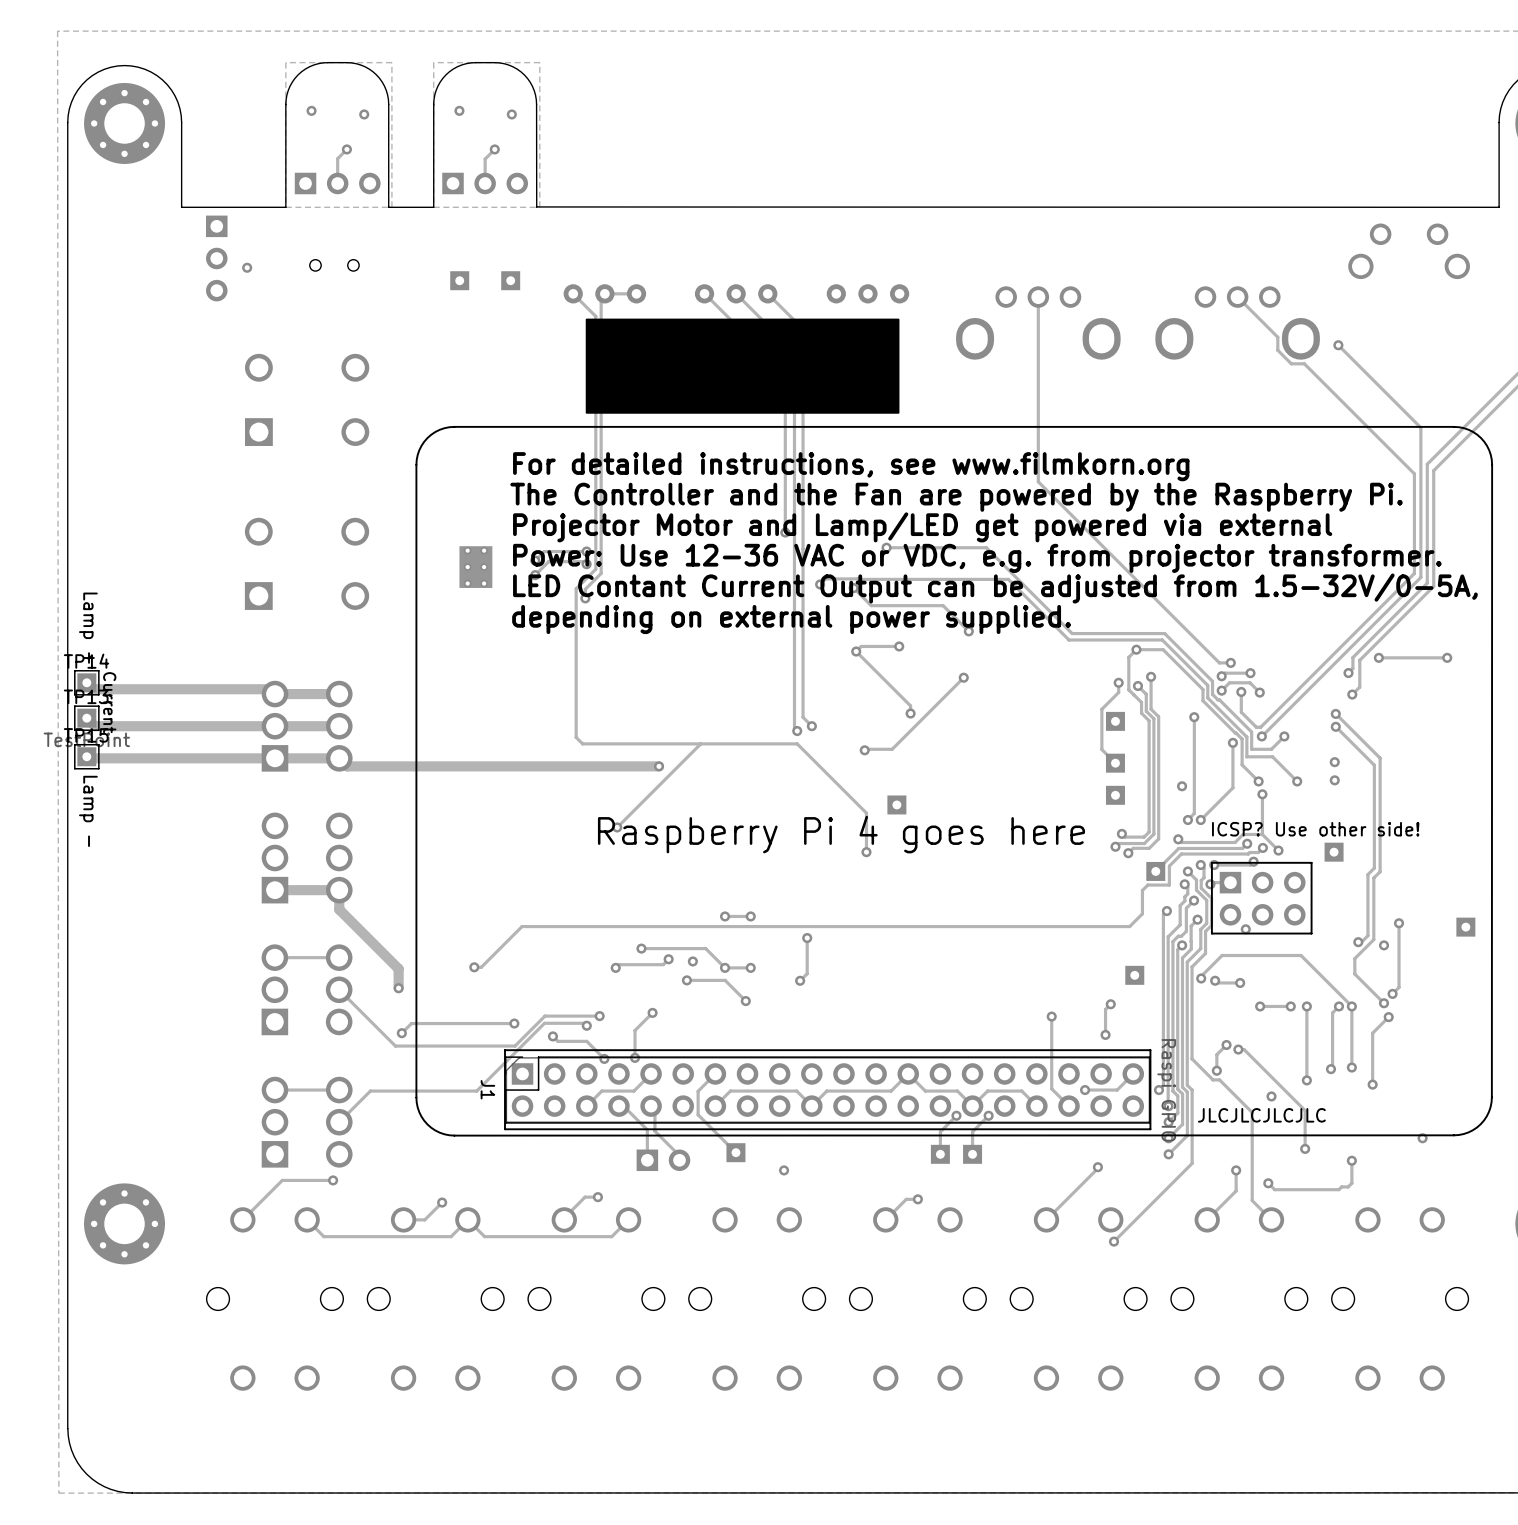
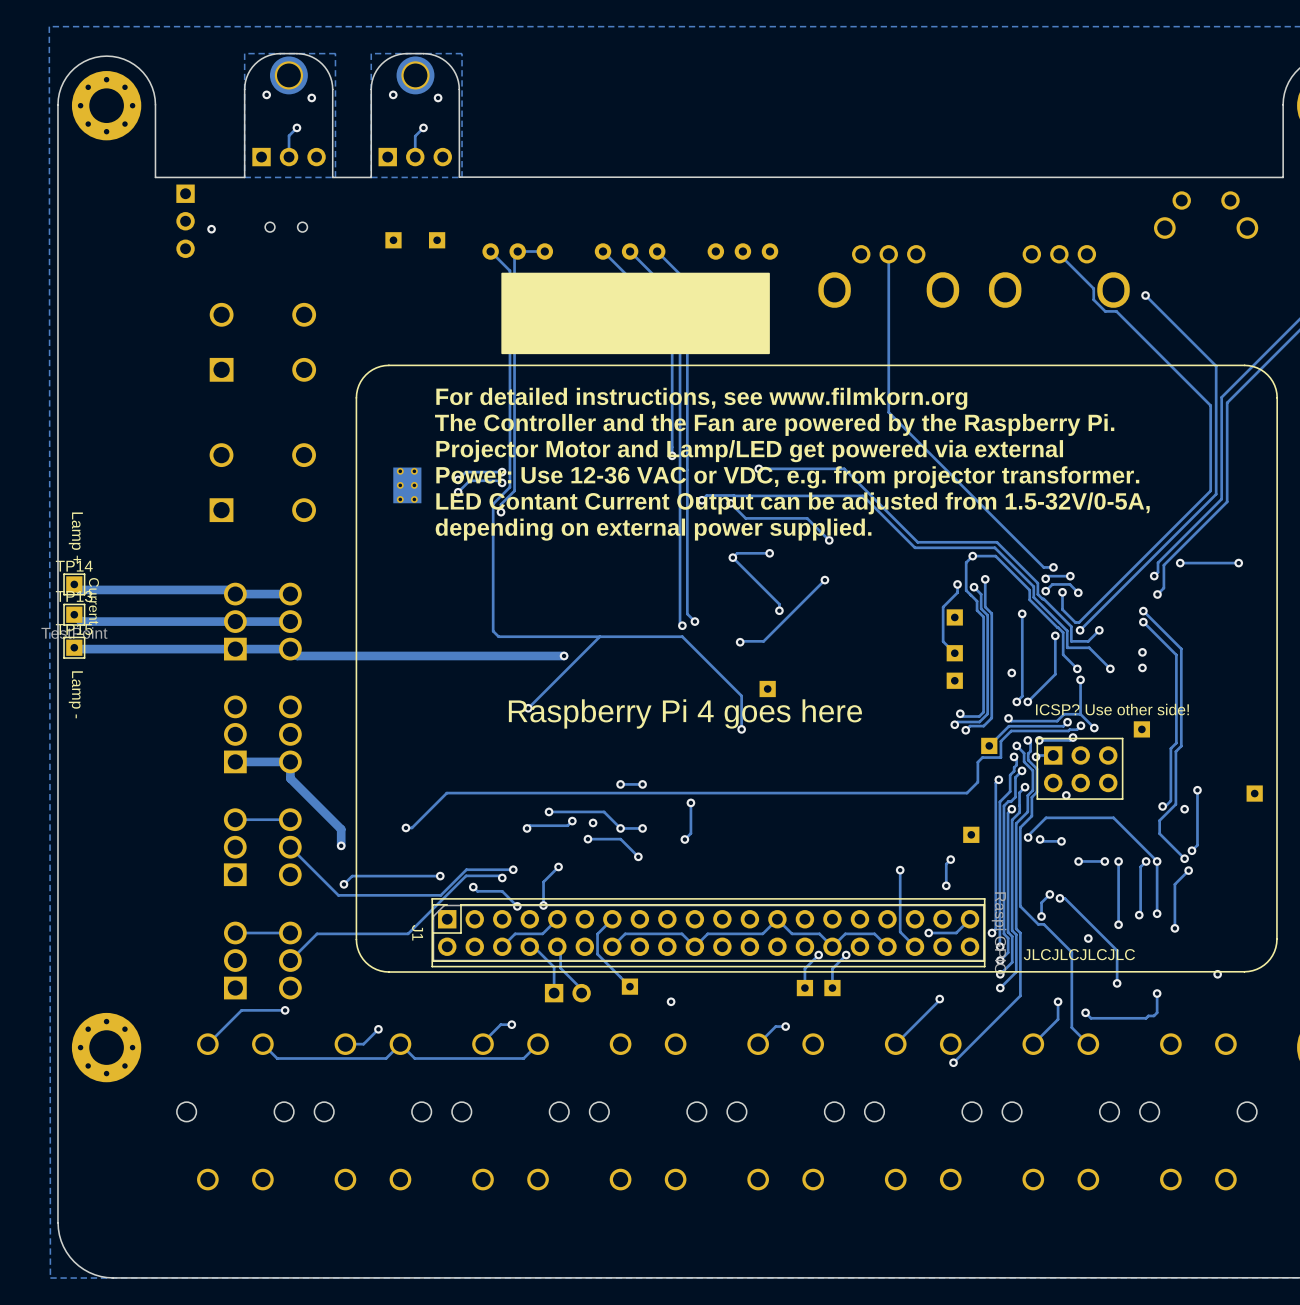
part: none -> (288, 75)
part: none -> (415, 75)

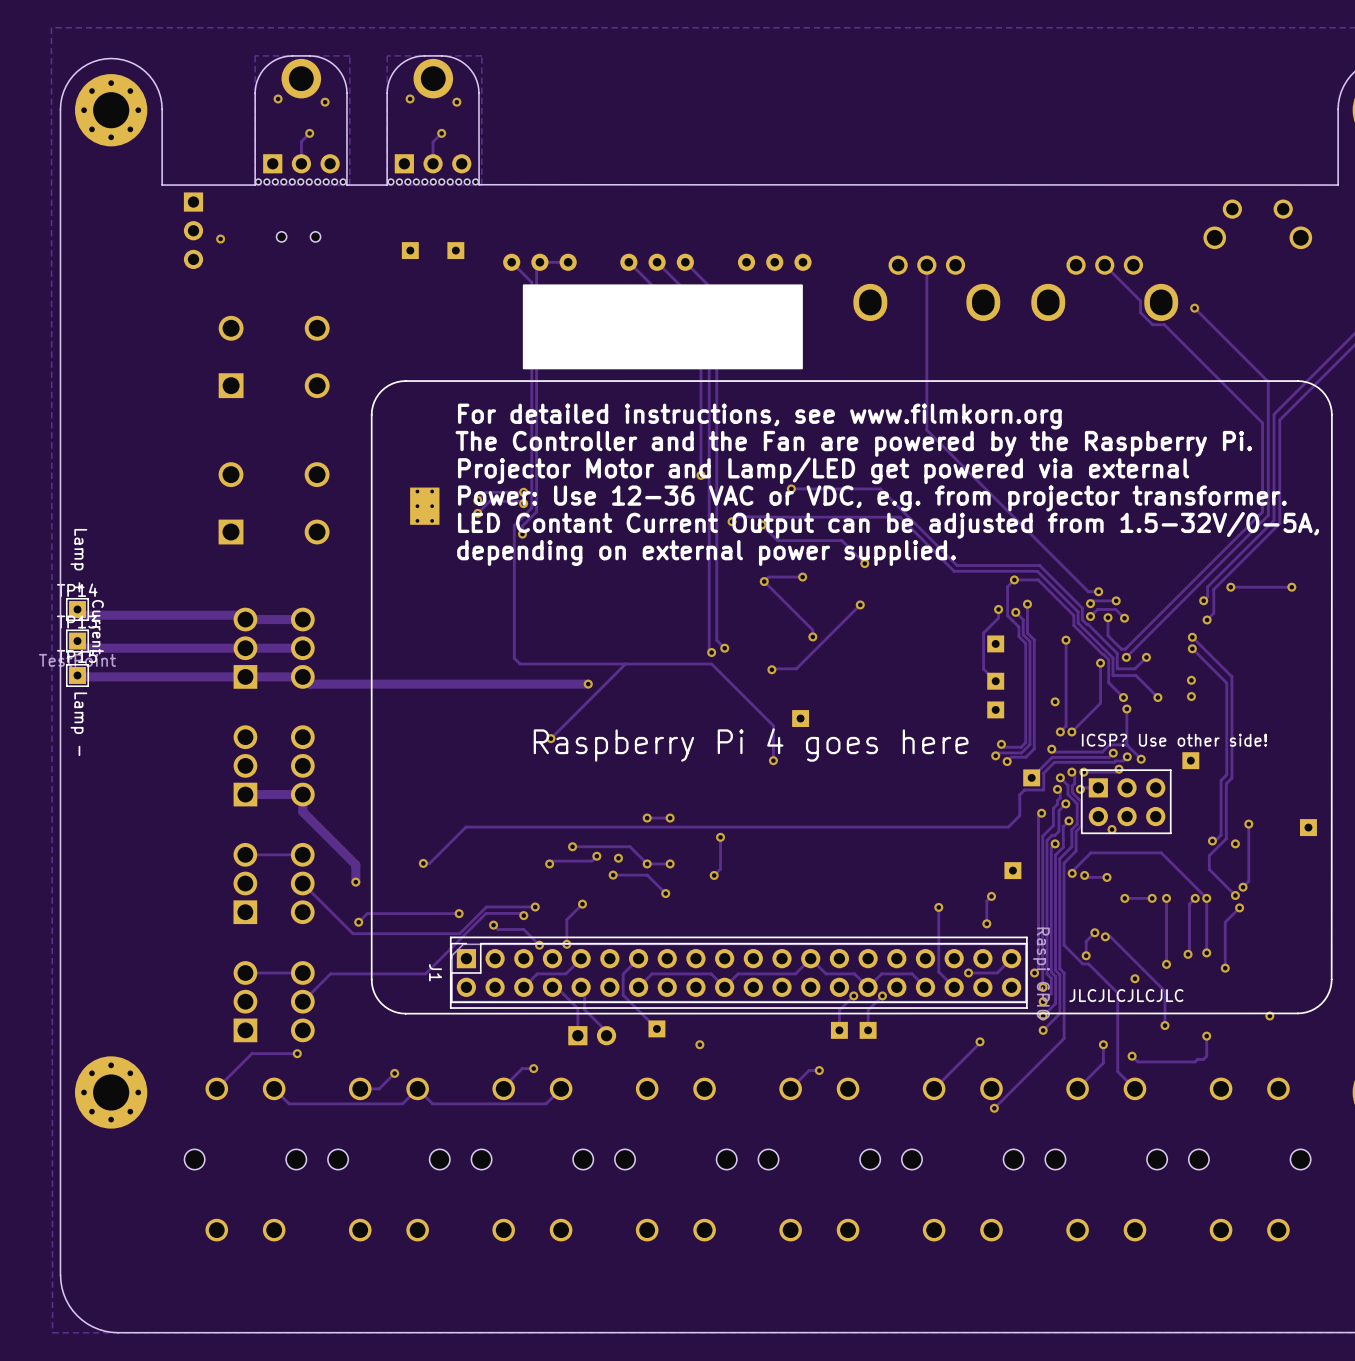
part: none -> (300, 181)
part: none -> (433, 181)

